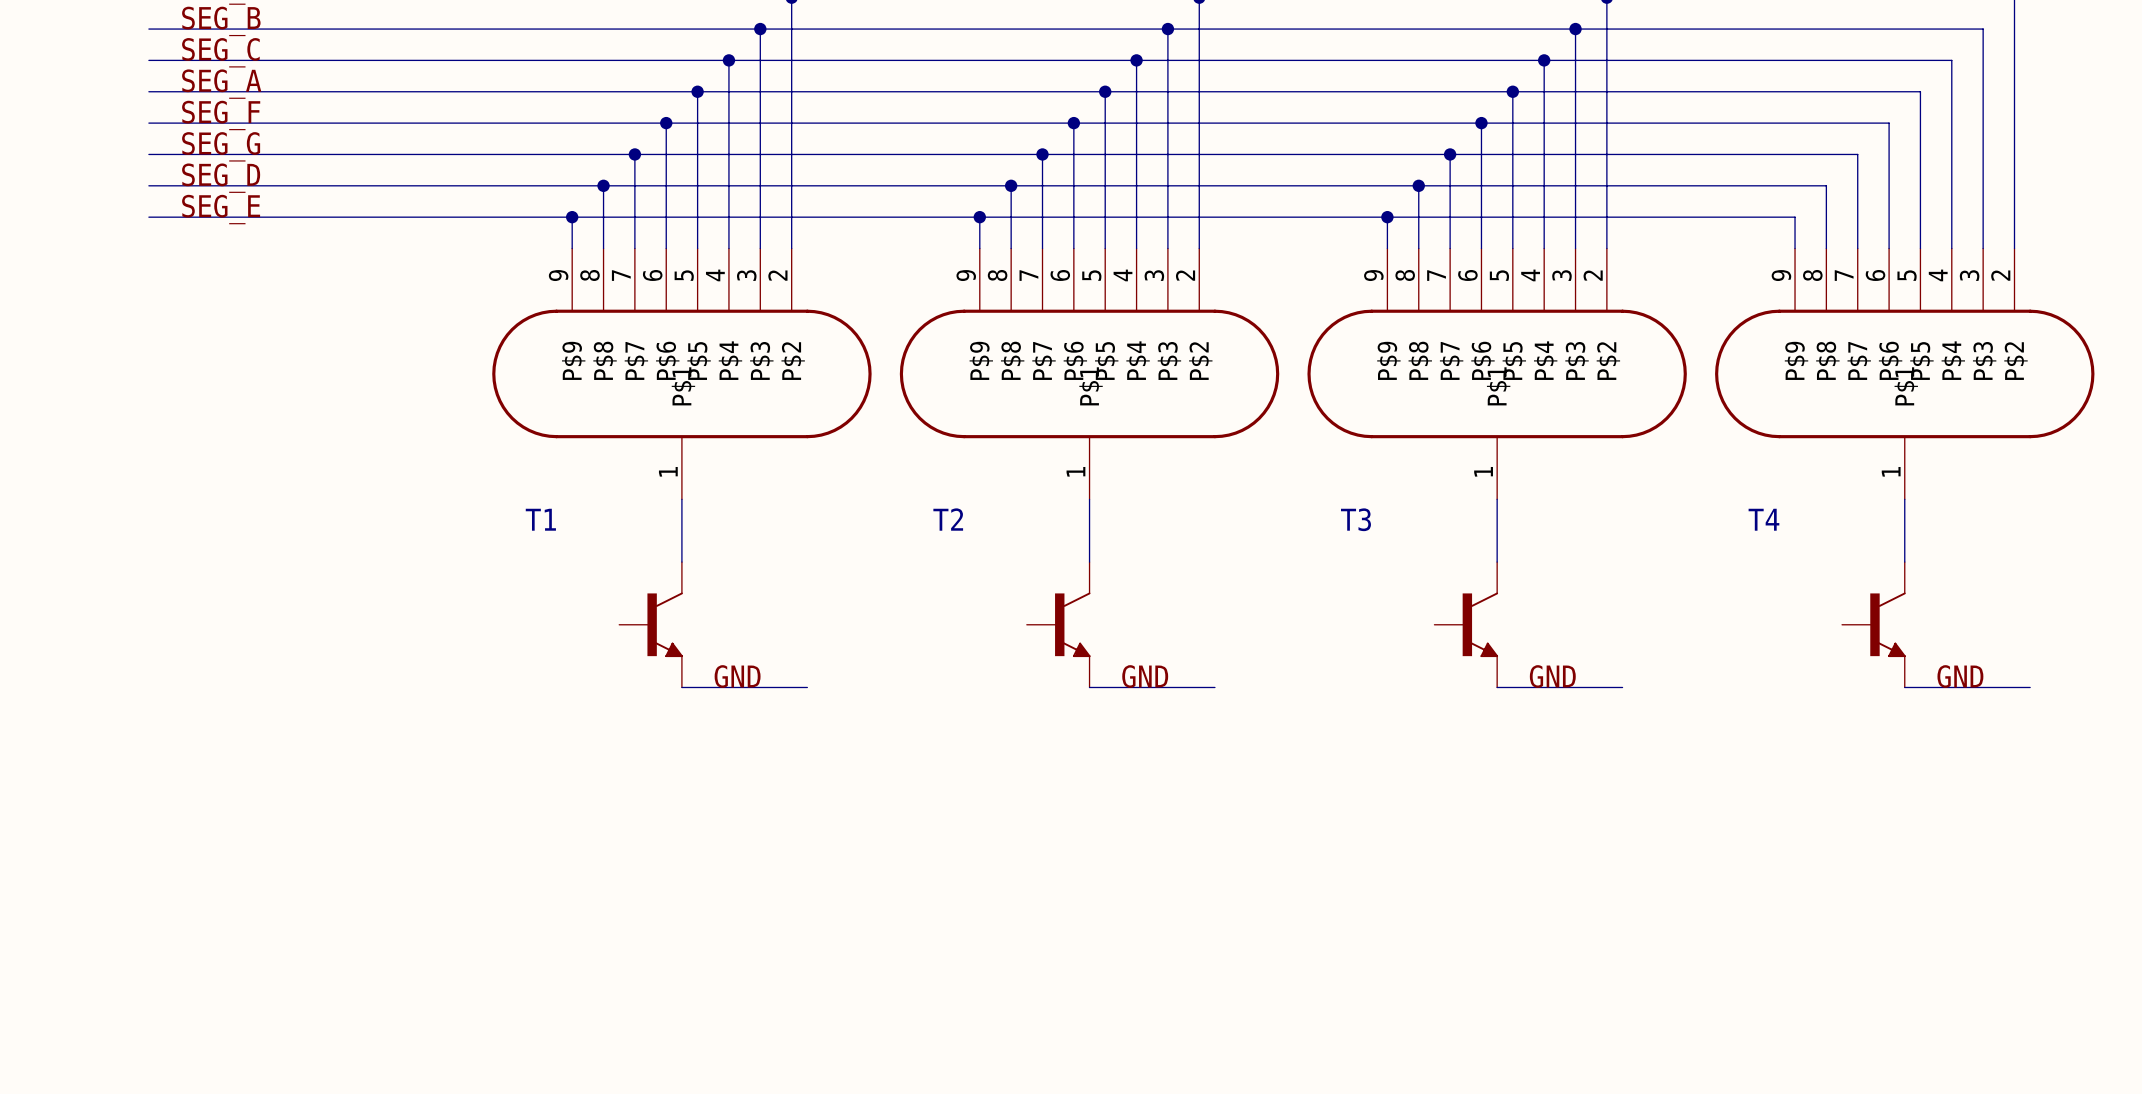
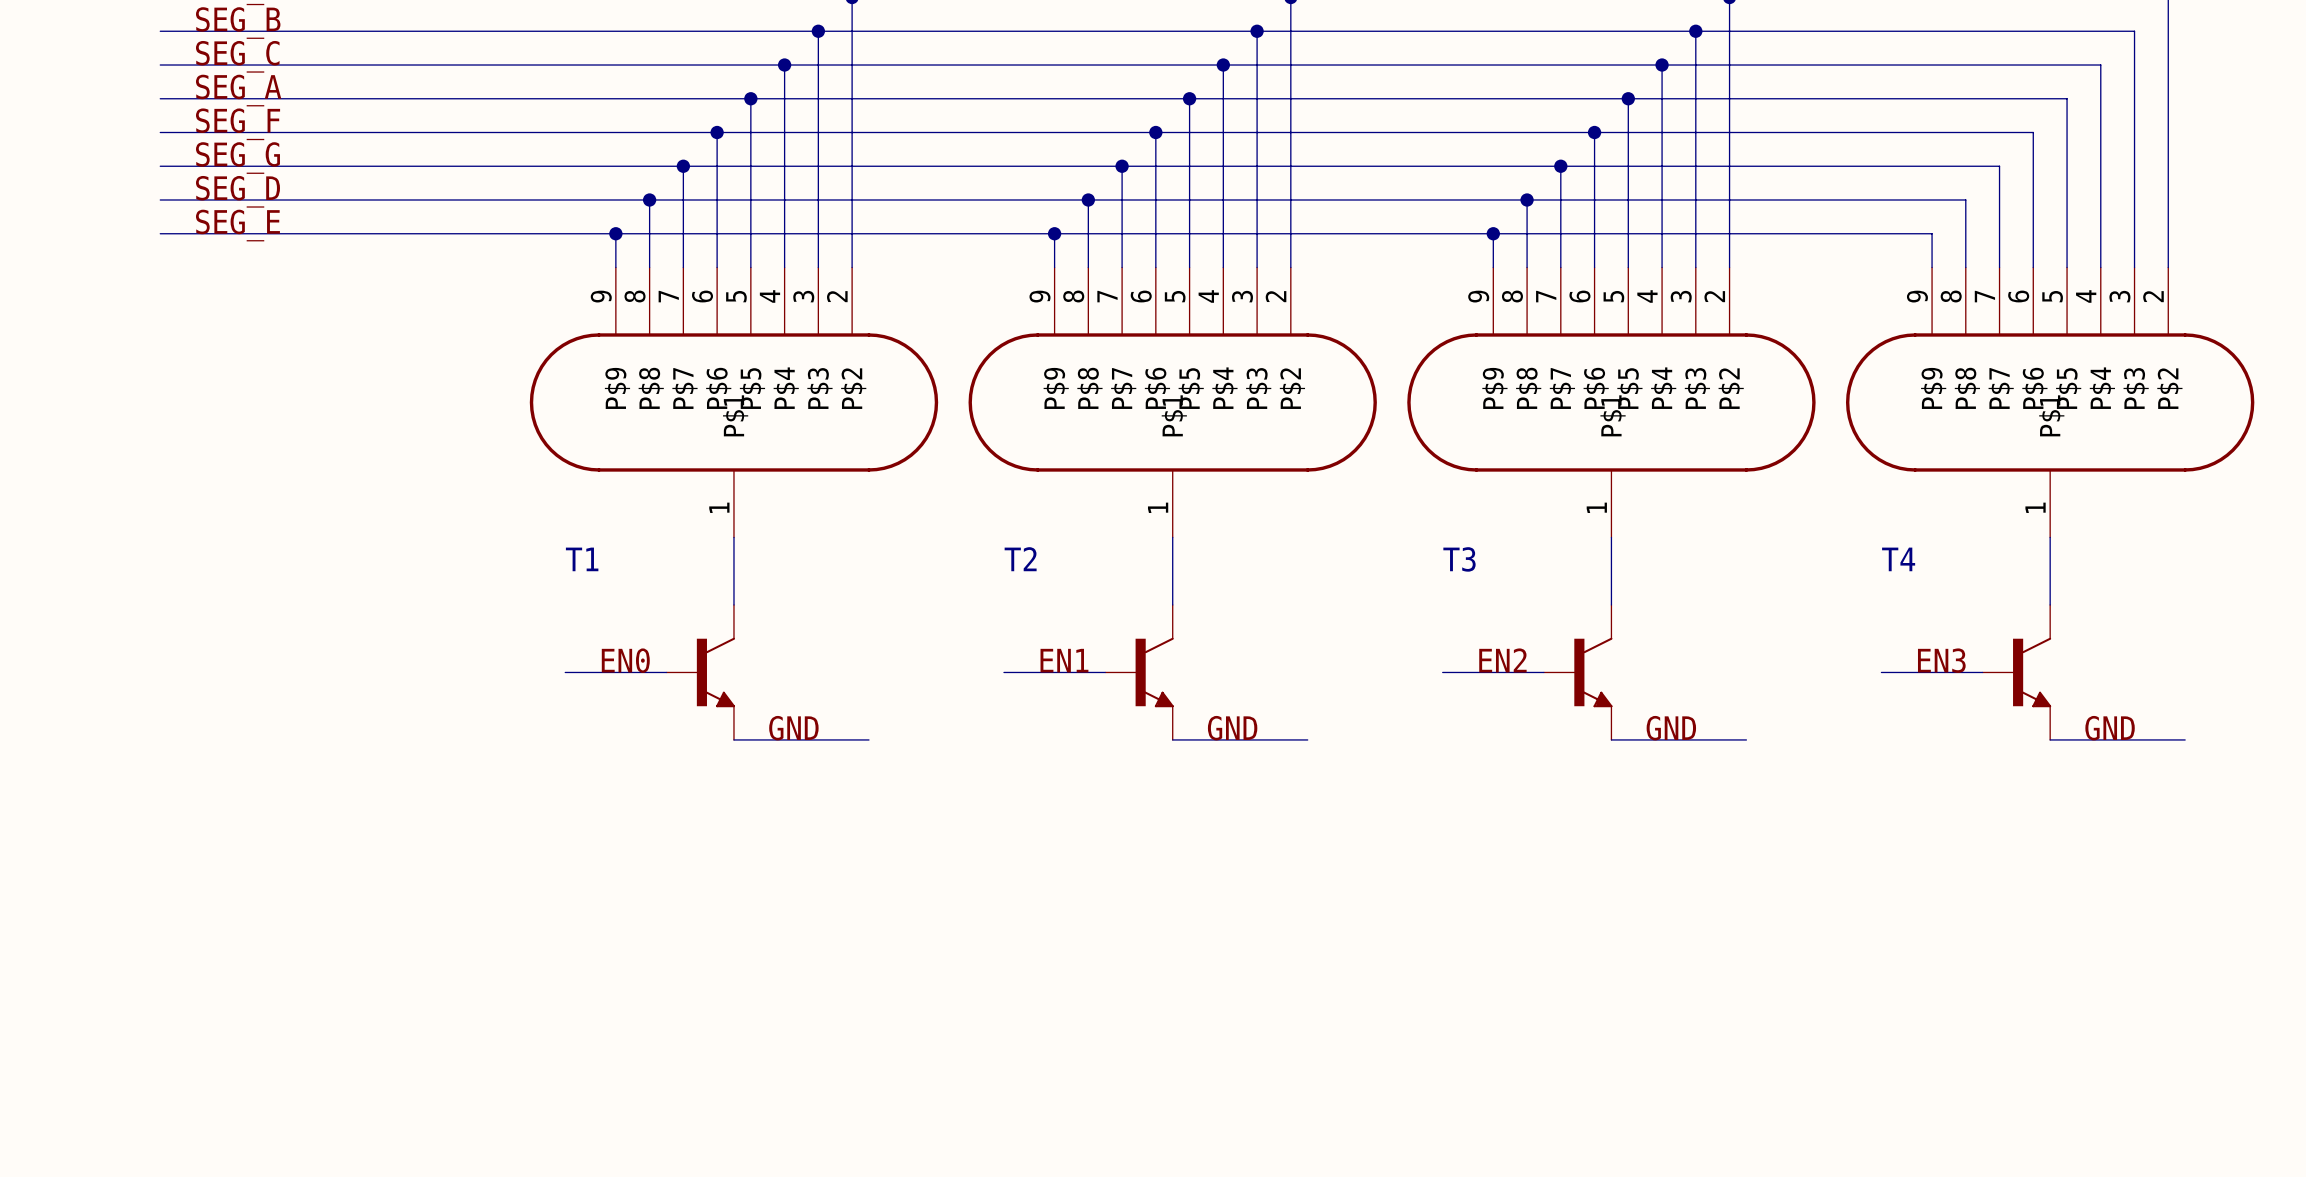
label: none -> EN0 (625, 660)
label: none -> EN1 (1064, 660)
label: none -> EN2 (1502, 660)
label: none -> EN3 (1941, 660)
wire: none -> (565, 672) (666, 672)
wire: none -> (1003, 672) (1105, 672)
wire: none -> (1442, 672) (1543, 672)
wire: none -> (1881, 672) (1982, 672)

